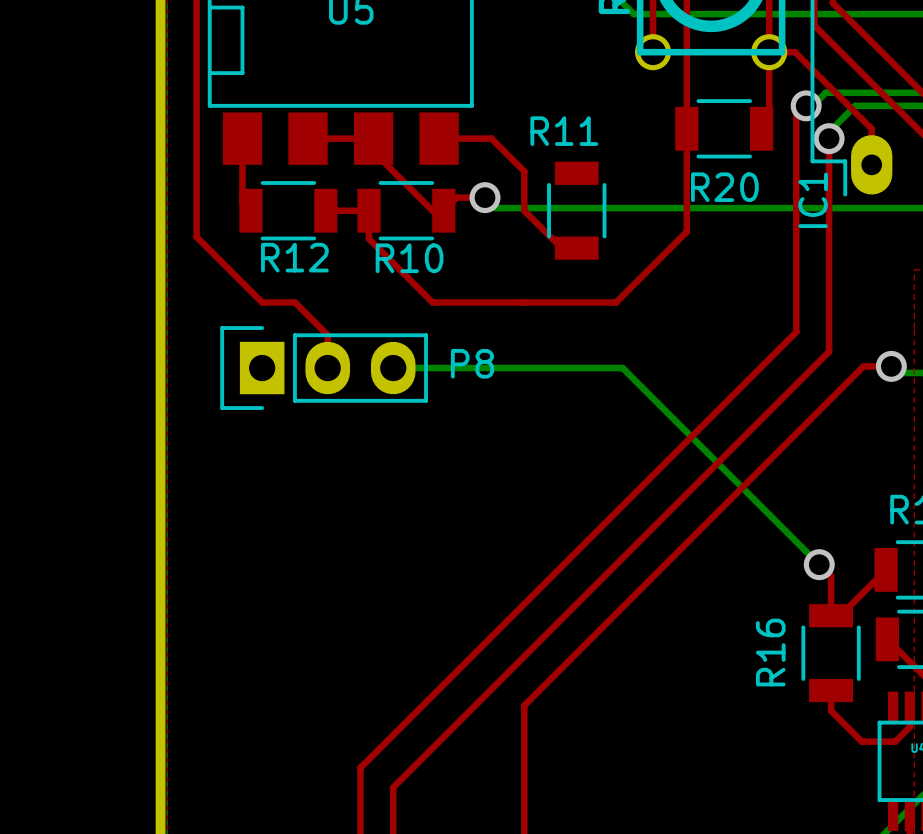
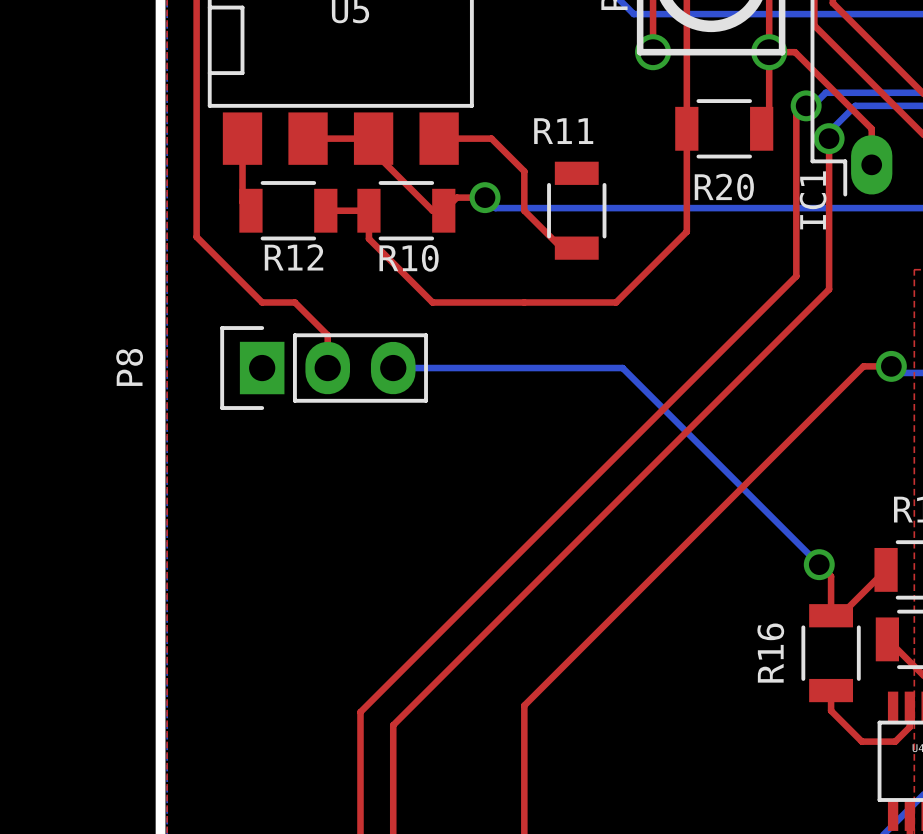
top track: (796, 276) (796, 331) (360, 767) -> (796, 276) (360, 712) (360, 767)
top track: (829, 289) (829, 351) (393, 787) -> (829, 289) (393, 725) (393, 787)
P8 name rotation: 0° (472, 363) -> 90° counterclockwise (129, 367)
P8 name position: P8 (472, 363) -> P8 (129, 367)

